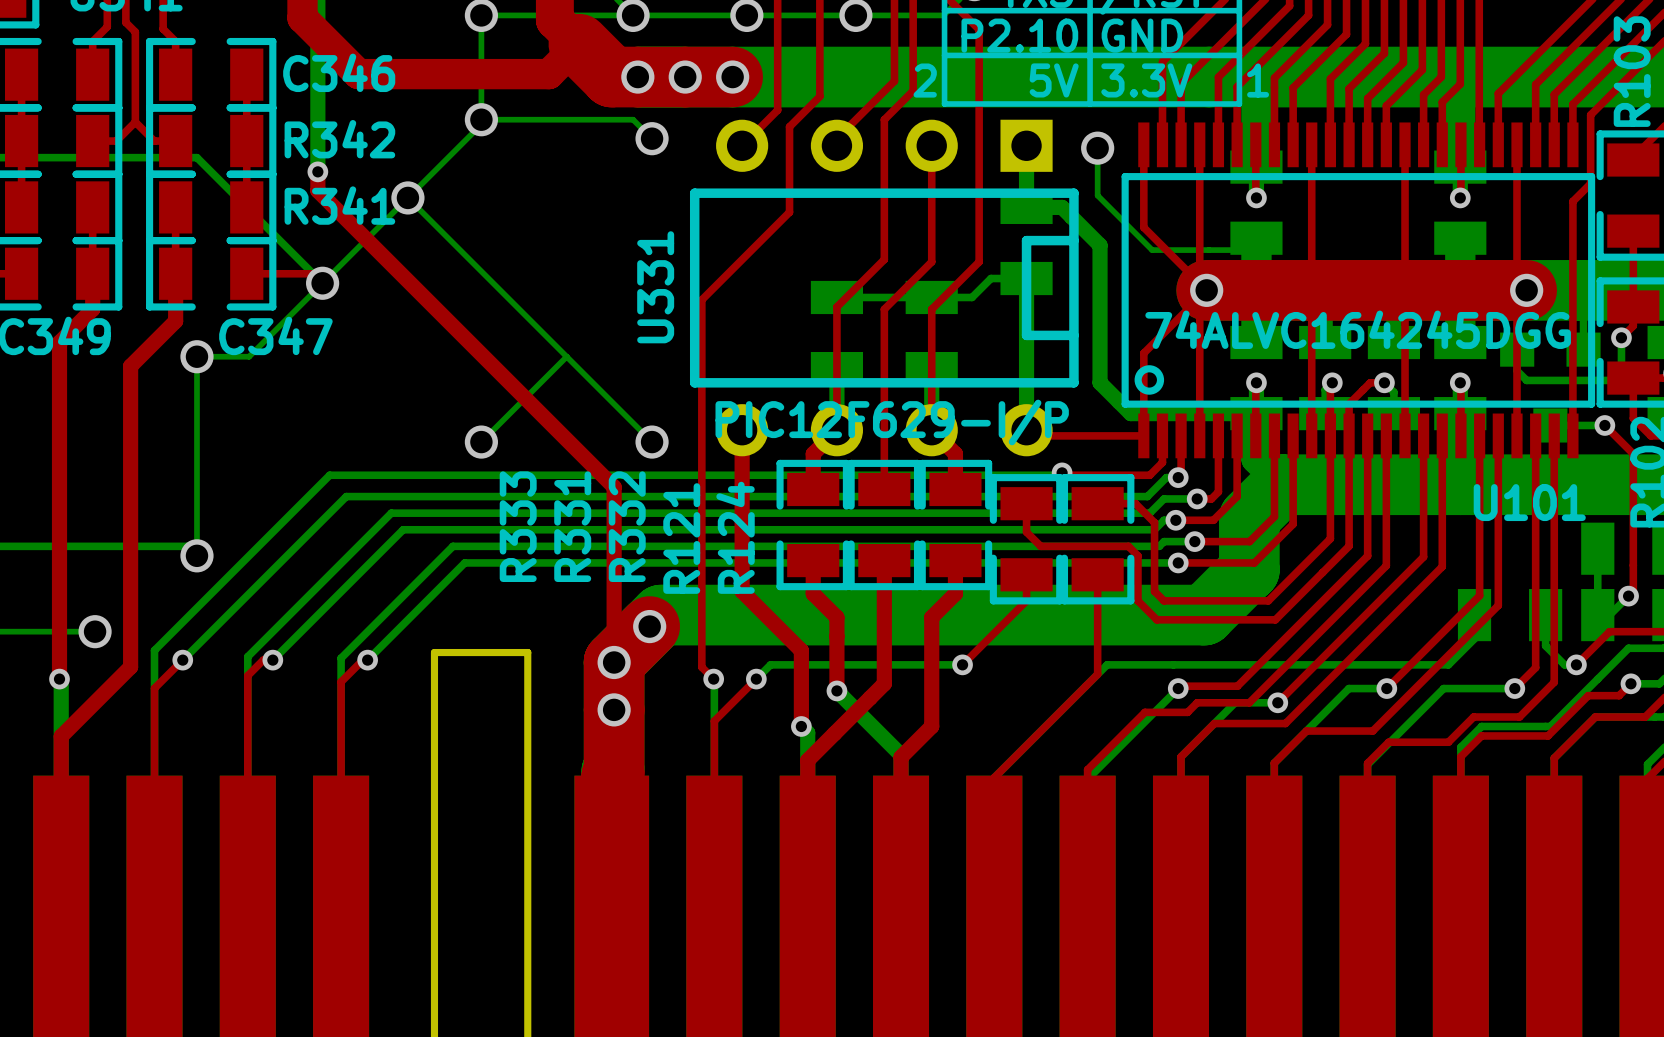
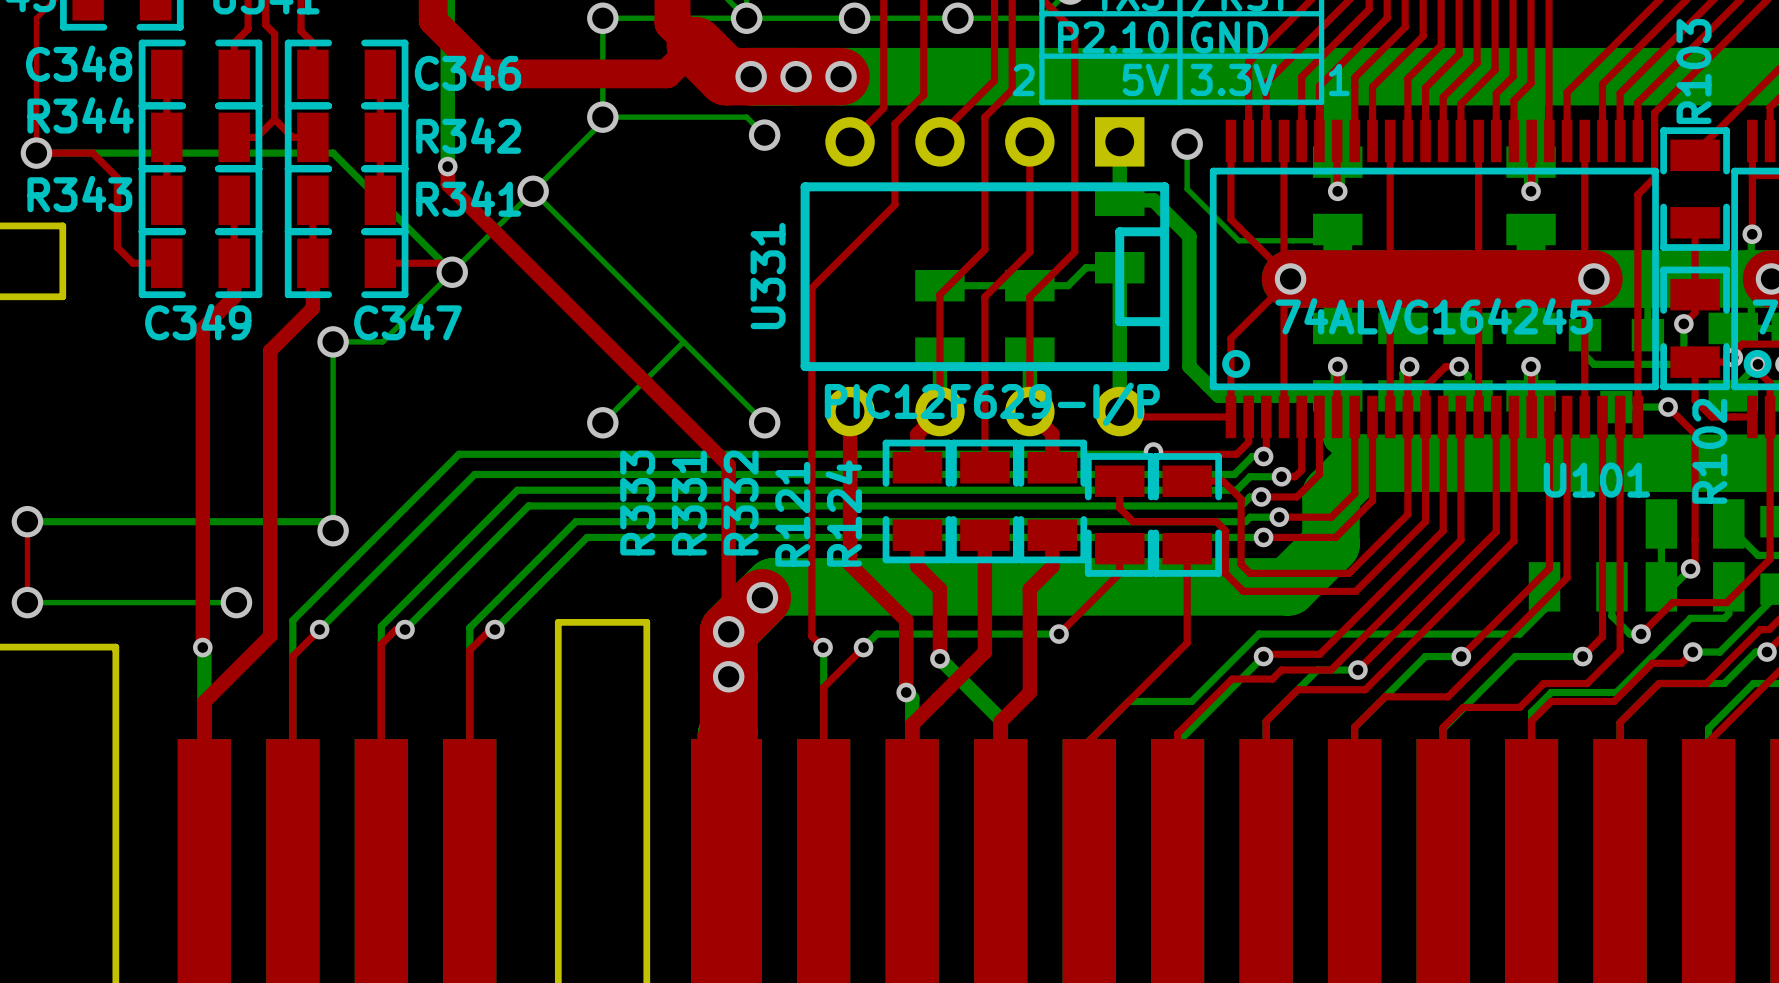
U101 value: 74ALVC164245DGG (1358, 329) -> 74ALVC164245 (1434, 316)
bottom track: (1173, 664) (1107, 664) (1036, 735) -> (1259, 634) (1191, 701) (1128, 701)

